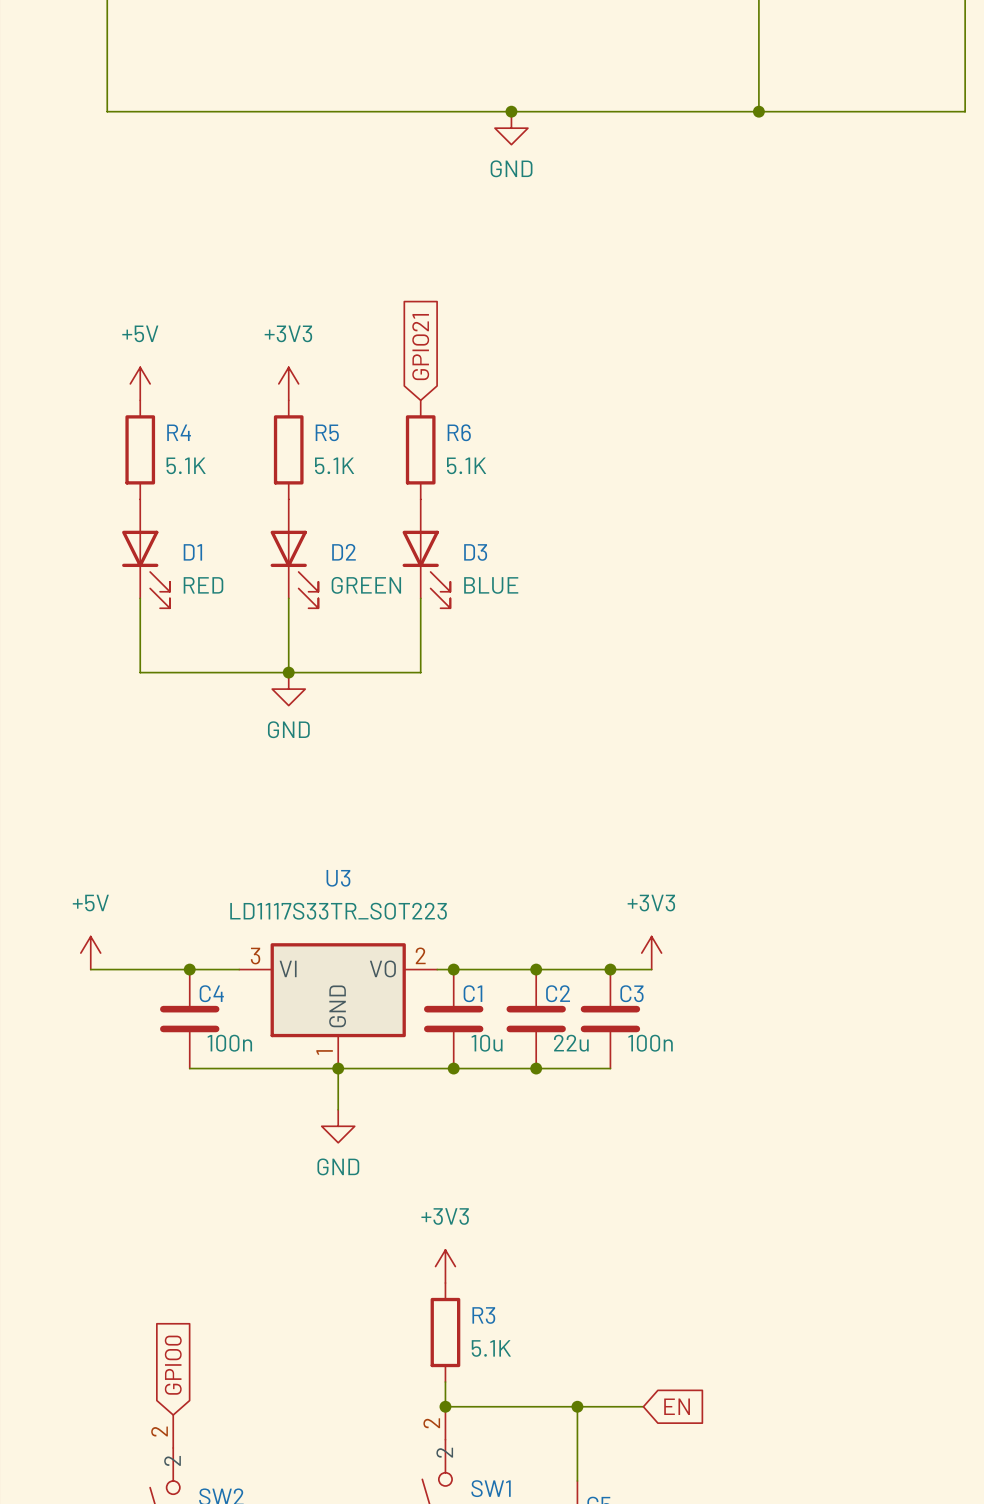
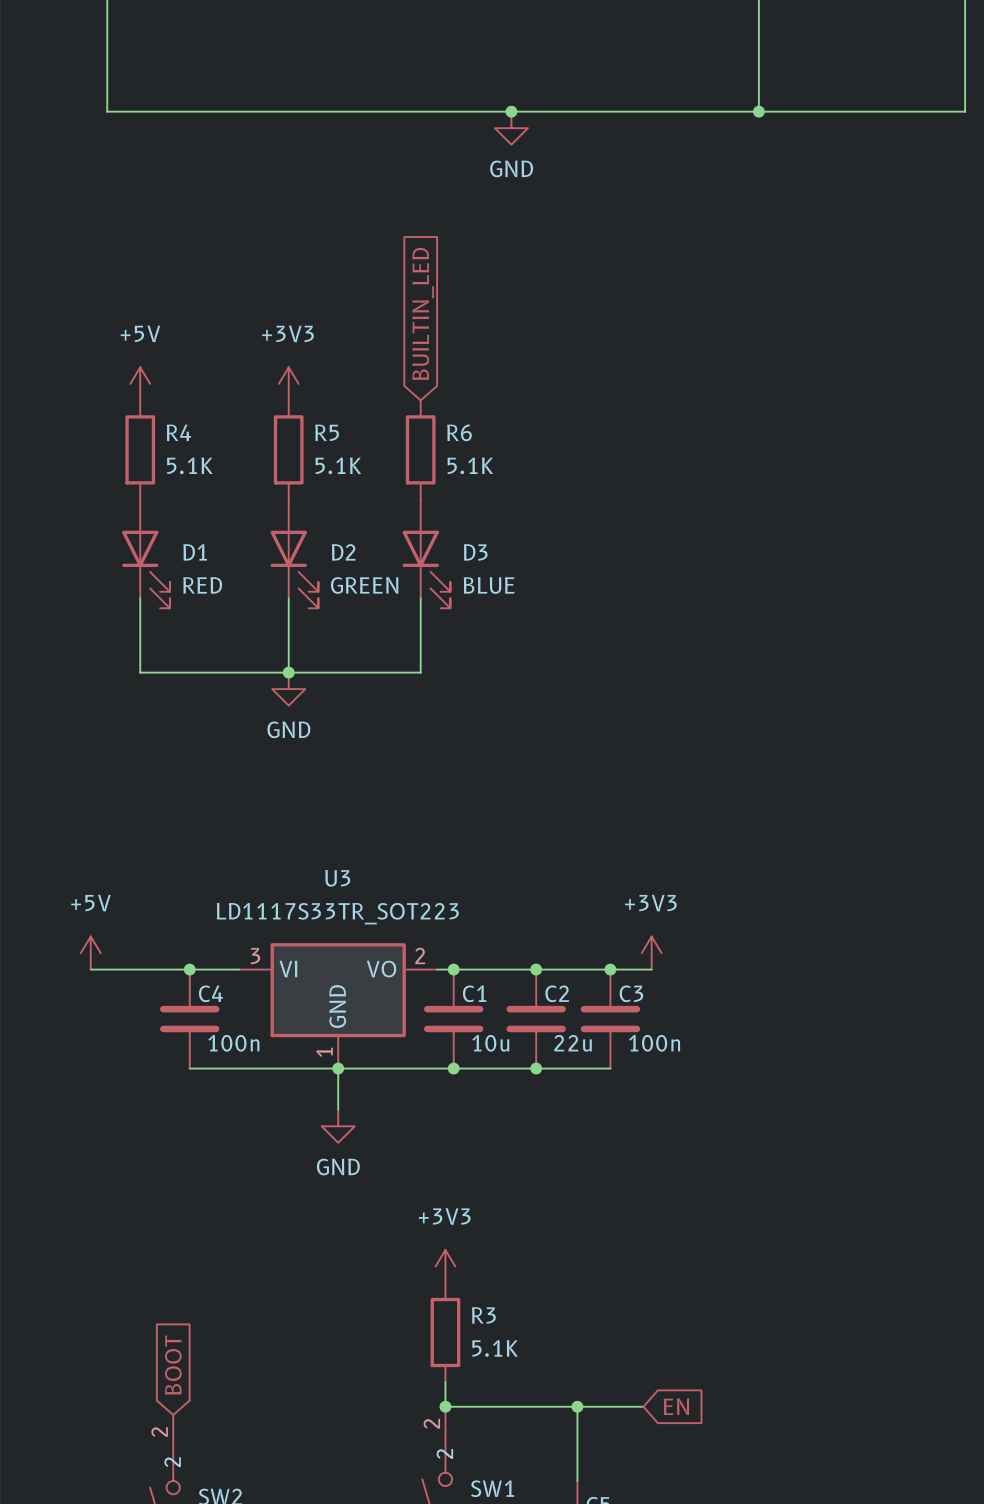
global label: GPIO21 (420, 347) -> BUILTIN_LED (423, 313)
global label: GPIO0 (173, 1365) -> BOOT (173, 1365)

